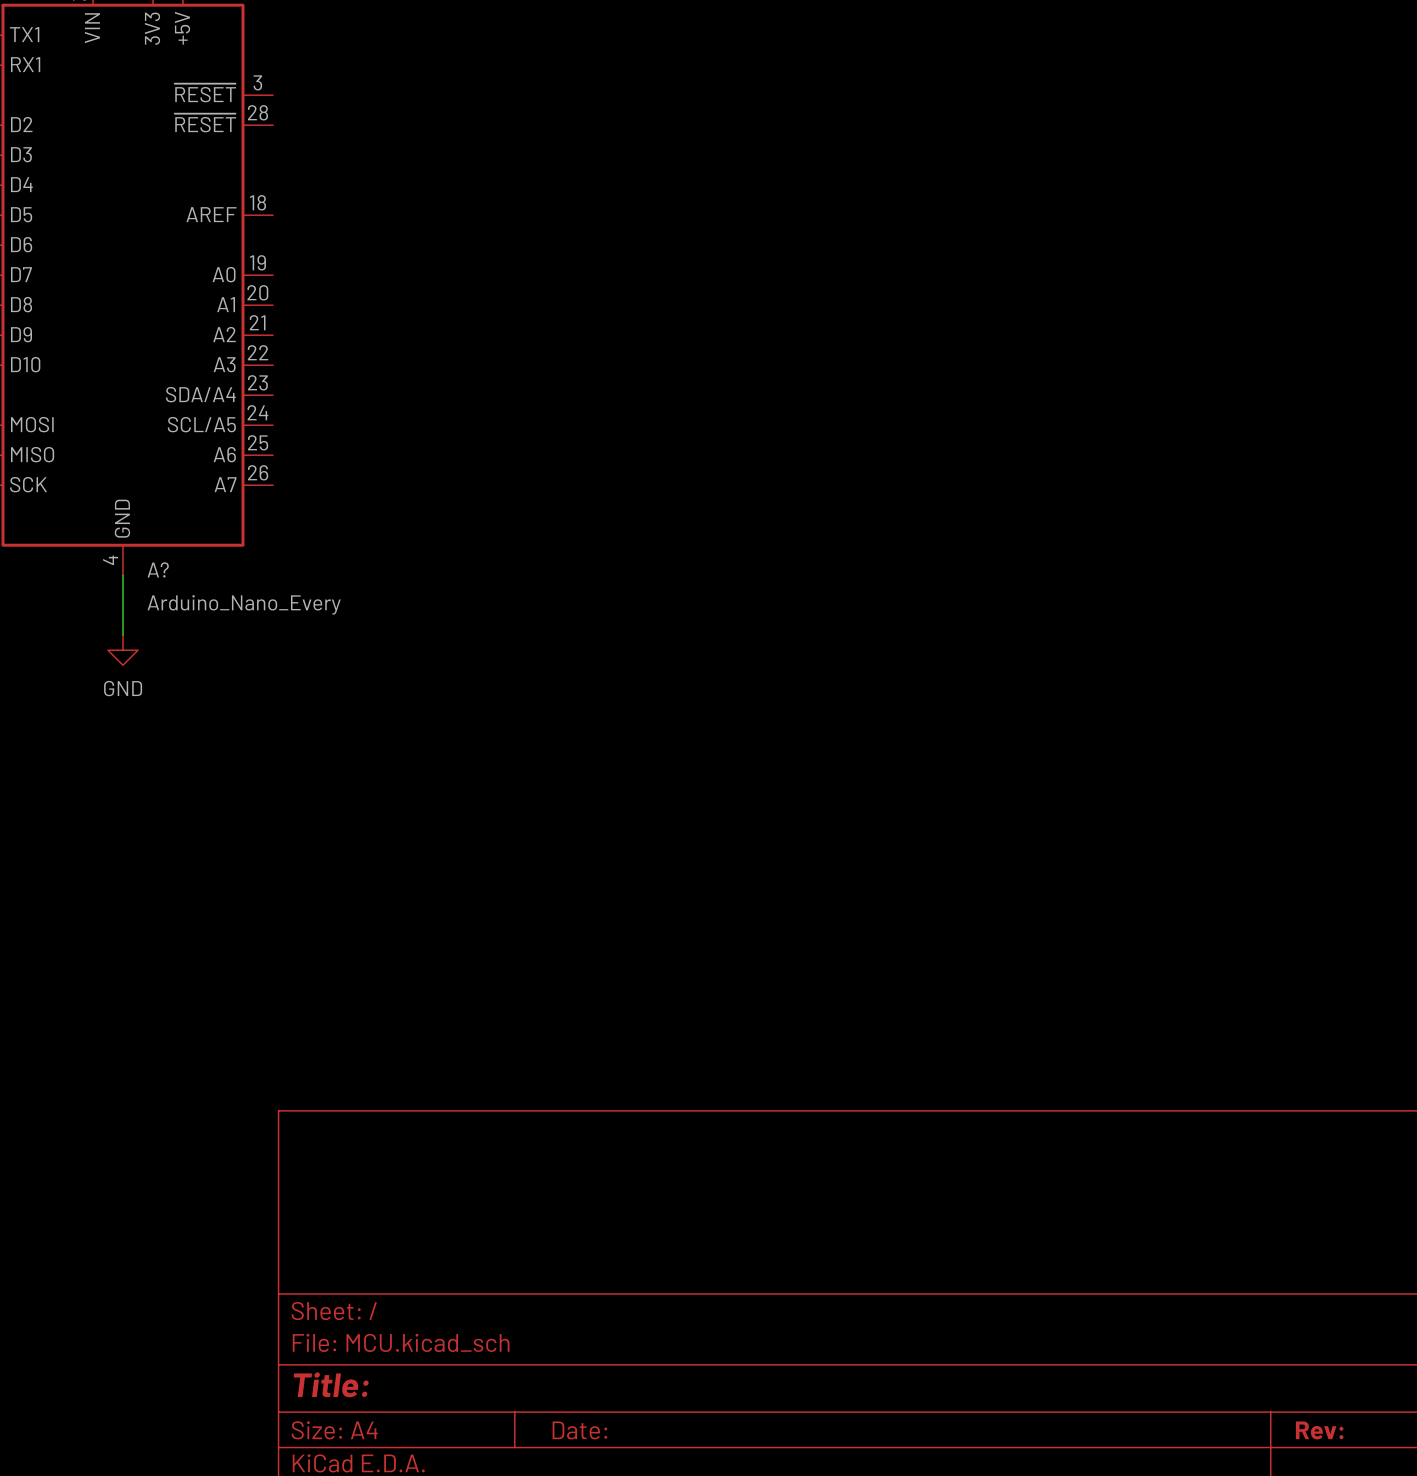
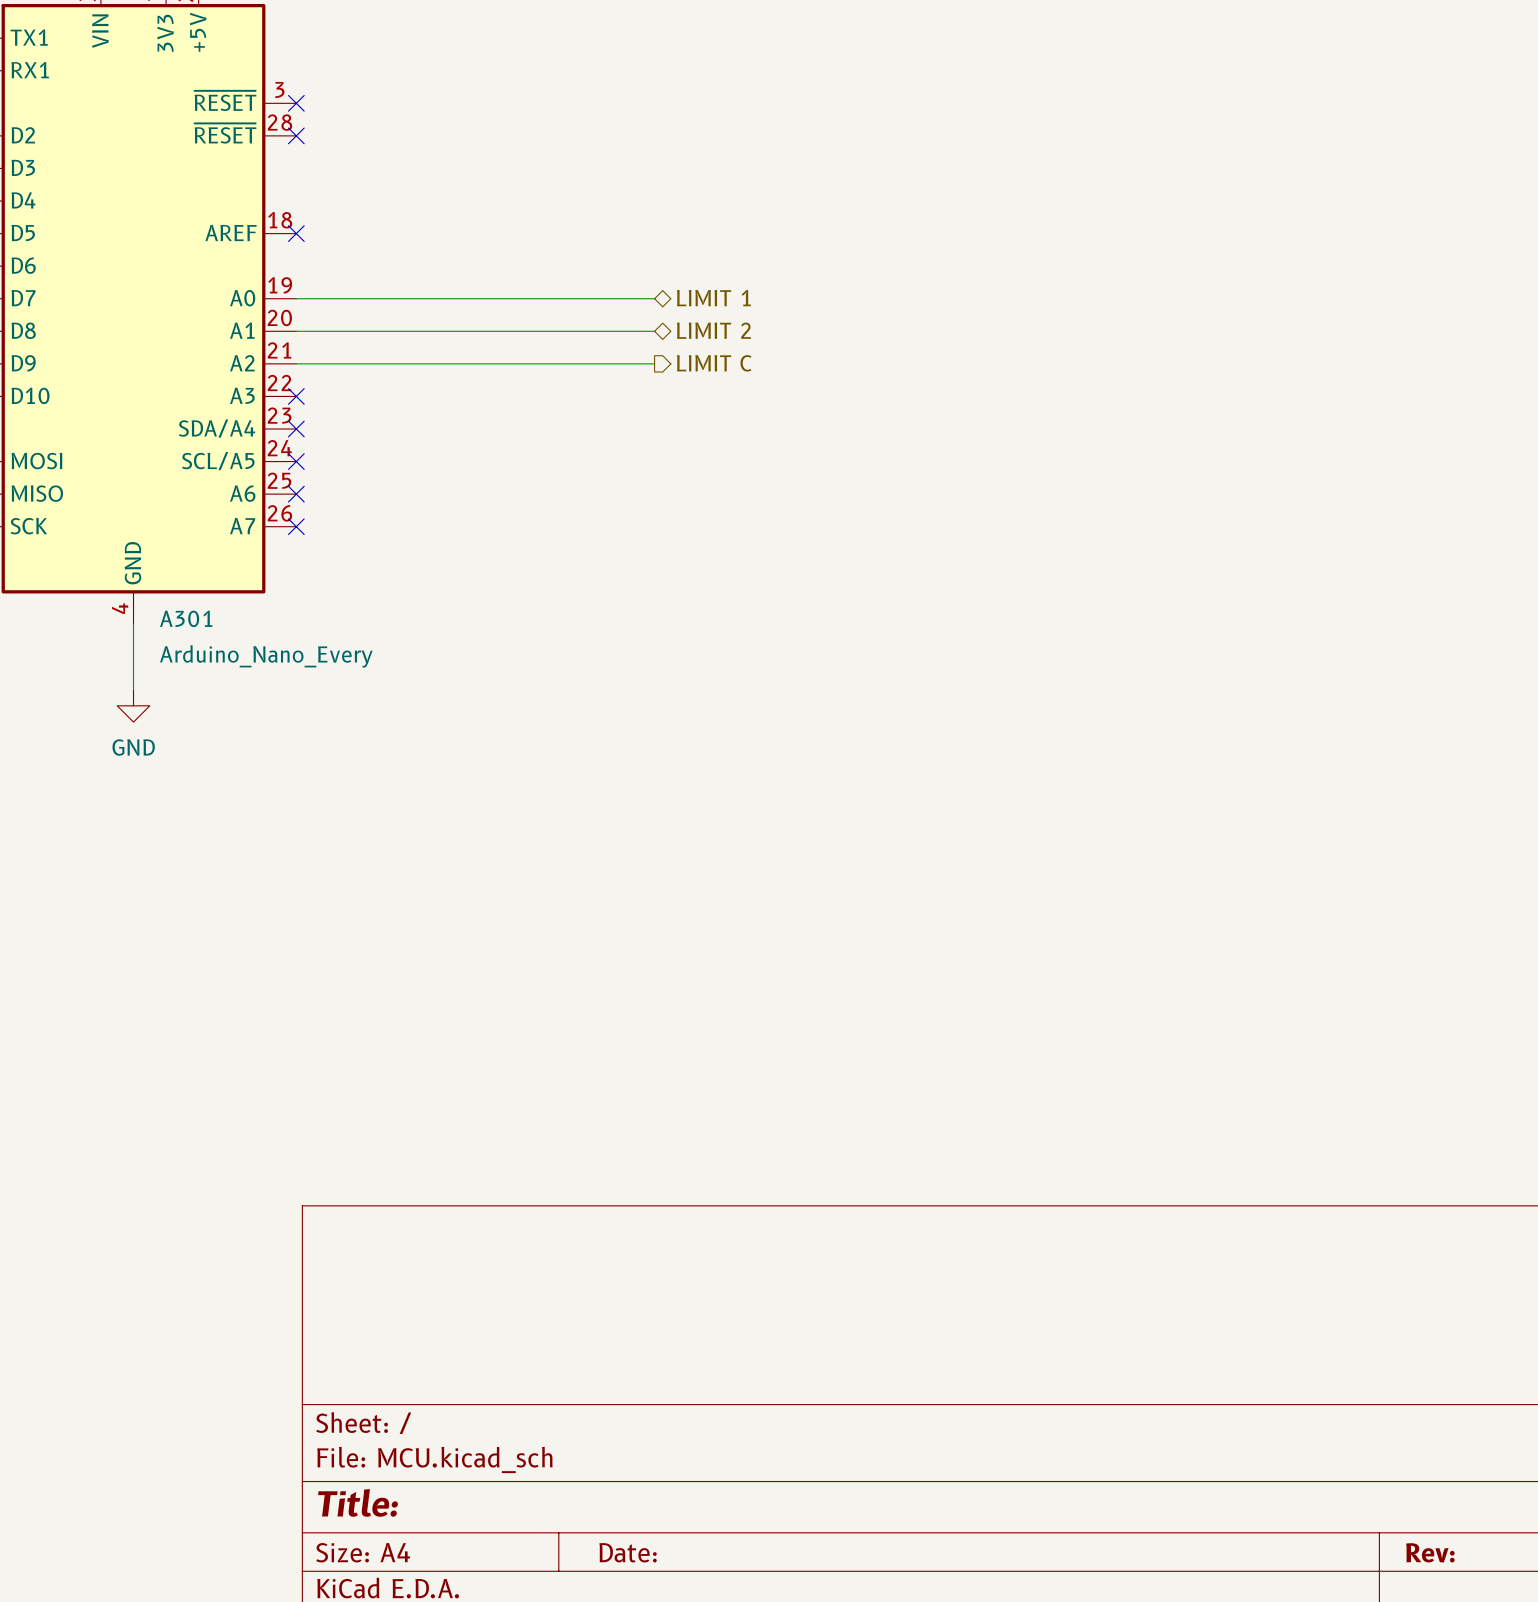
no-connect mark: none -> (296, 103)
no-connect mark: none -> (296, 135)
no-connect mark: none -> (296, 233)
hierarchical label: none -> LIMIT 1 (713, 298)
wire: none -> (296, 298) (654, 298)
hierarchical label: none -> LIMIT 2 (713, 330)
wire: none -> (296, 331) (654, 331)
hierarchical label: none -> LIMIT C (714, 363)
wire: none -> (296, 363) (654, 363)
no-connect mark: none -> (296, 396)
no-connect mark: none -> (296, 429)
no-connect mark: none -> (296, 461)
no-connect mark: none -> (296, 494)
no-connect mark: none -> (296, 526)
A? name: A? (158, 569) -> A301 (186, 618)

